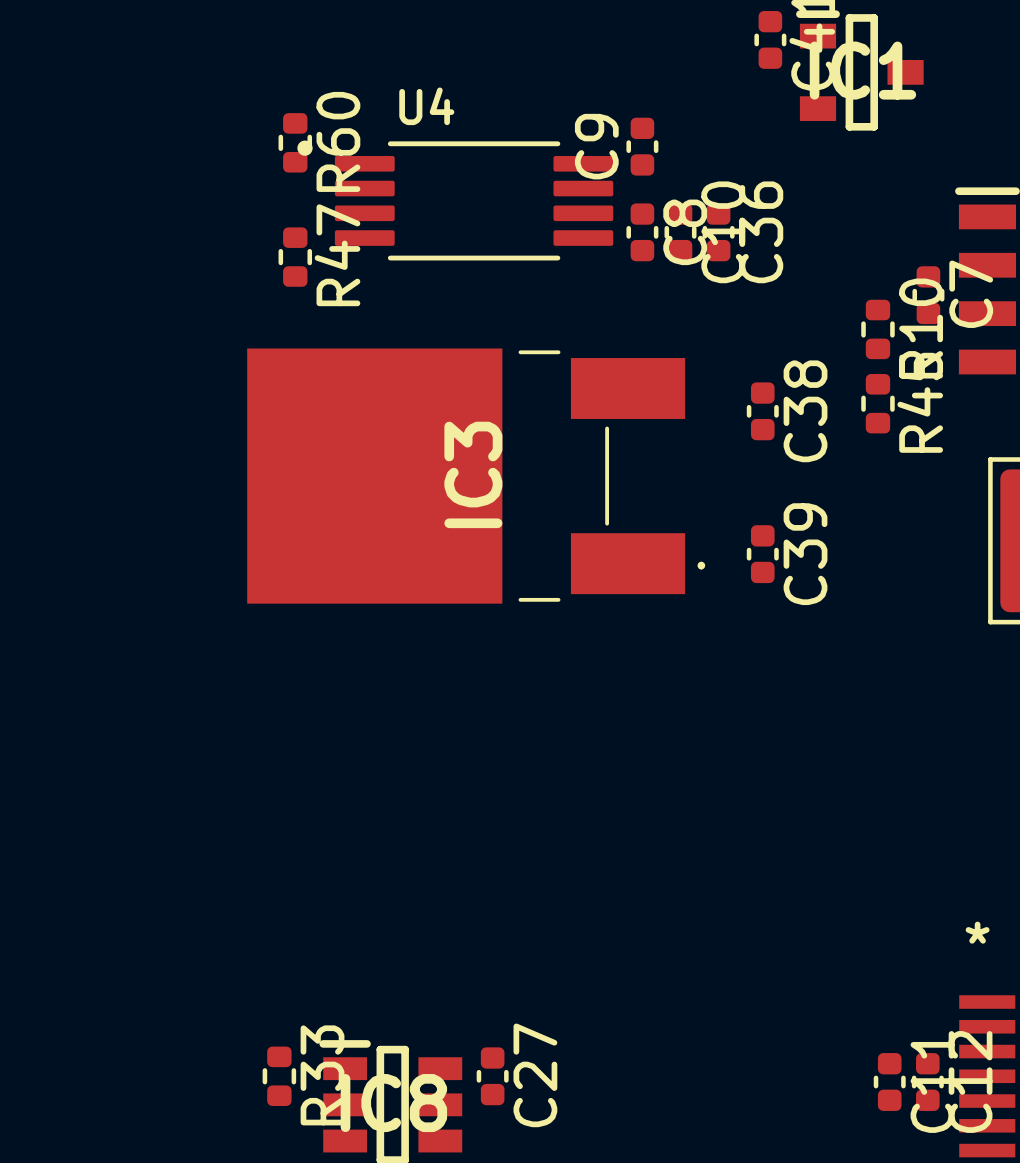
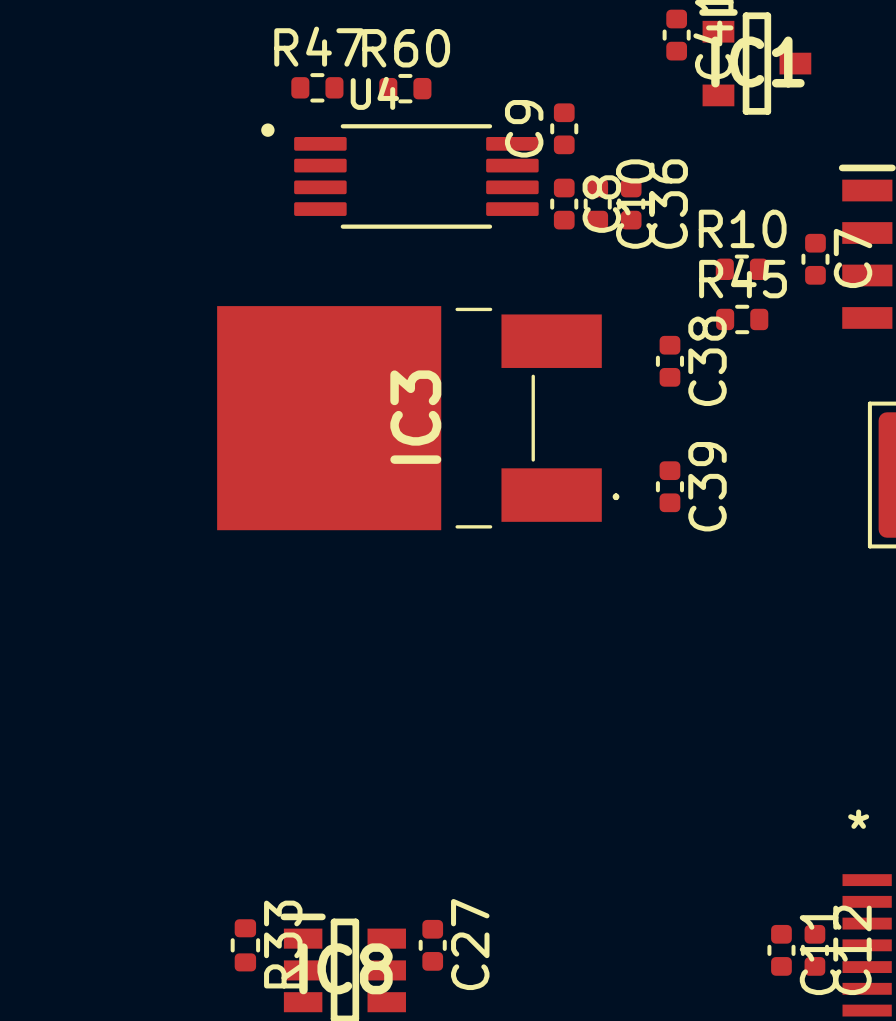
R60 rotation: 0° (295, 142) -> 90° clockwise (405, 88)
R60 position: (295, 142) -> (405, 88)
R47 rotation: 0° (295, 257) -> 90° clockwise (317, 87)
R47 position: (295, 257) -> (317, 87)
R10 rotation: 0° (877, 329) -> 90° clockwise (741, 269)
R10 position: (877, 329) -> (741, 269)
R45 rotation: 0° (877, 403) -> 90° clockwise (742, 319)
R45 position: (877, 403) -> (742, 319)

